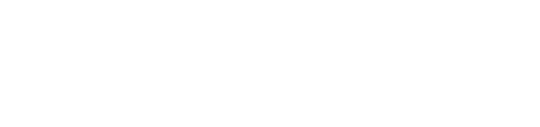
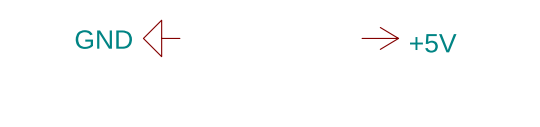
power symbol: none -> GND (161, 38)
power symbol: none -> +5V (380, 38)

